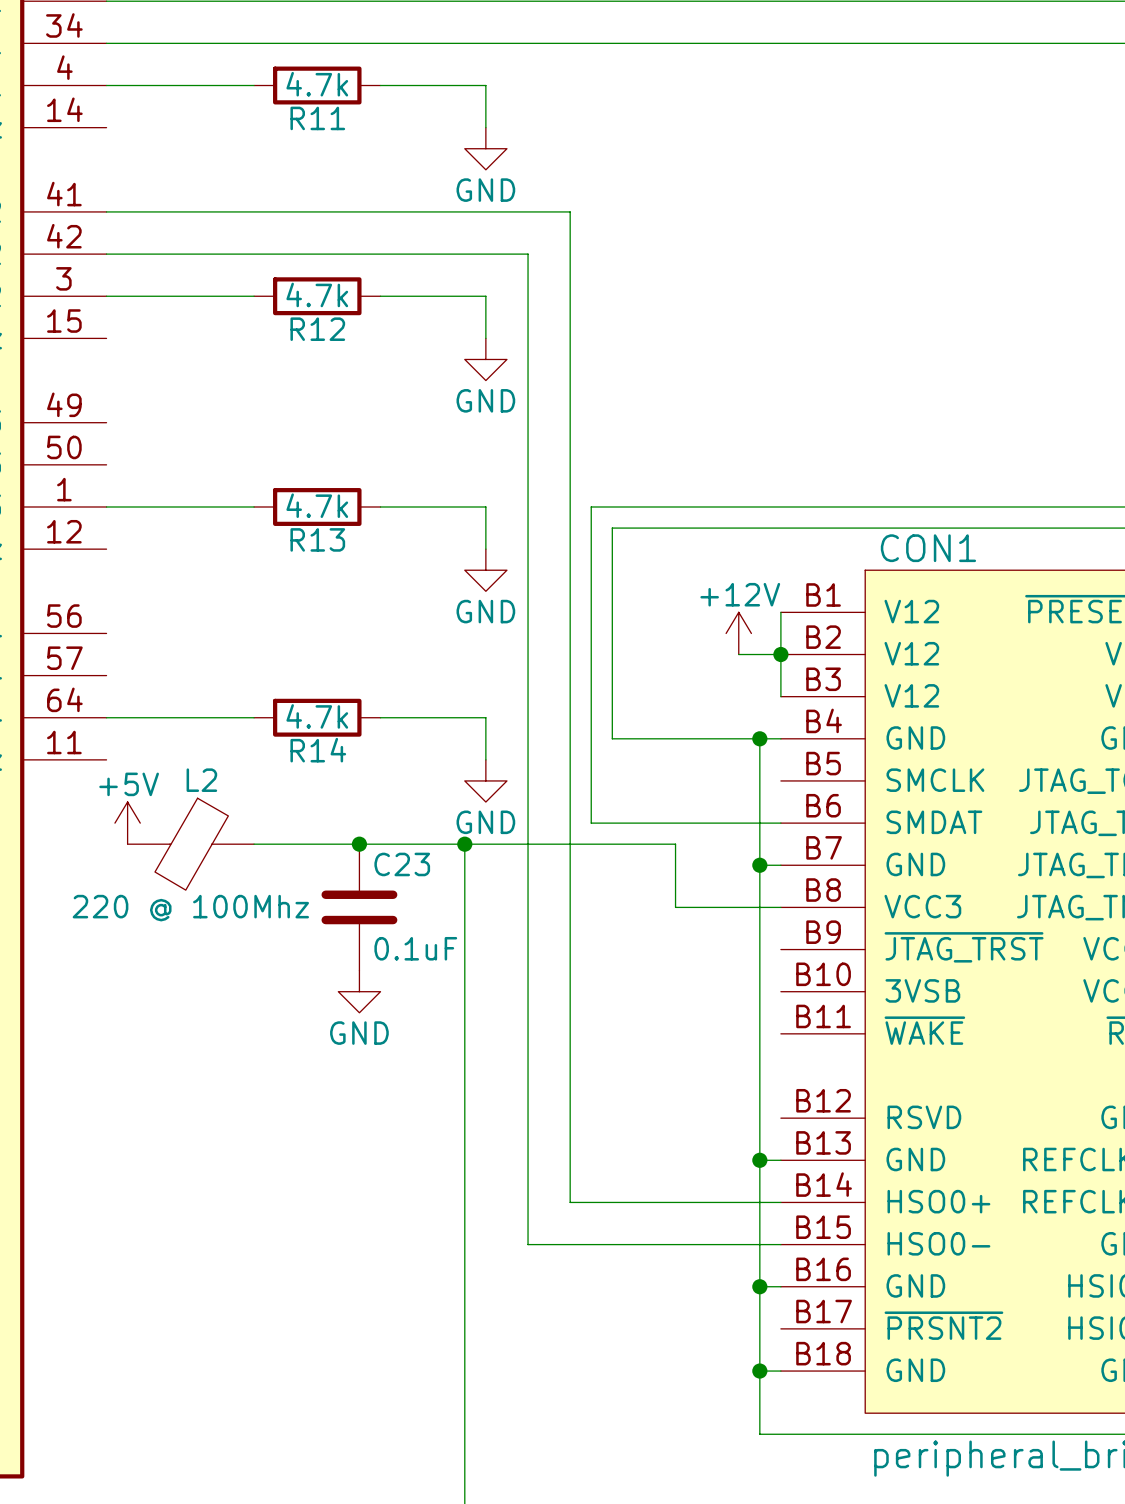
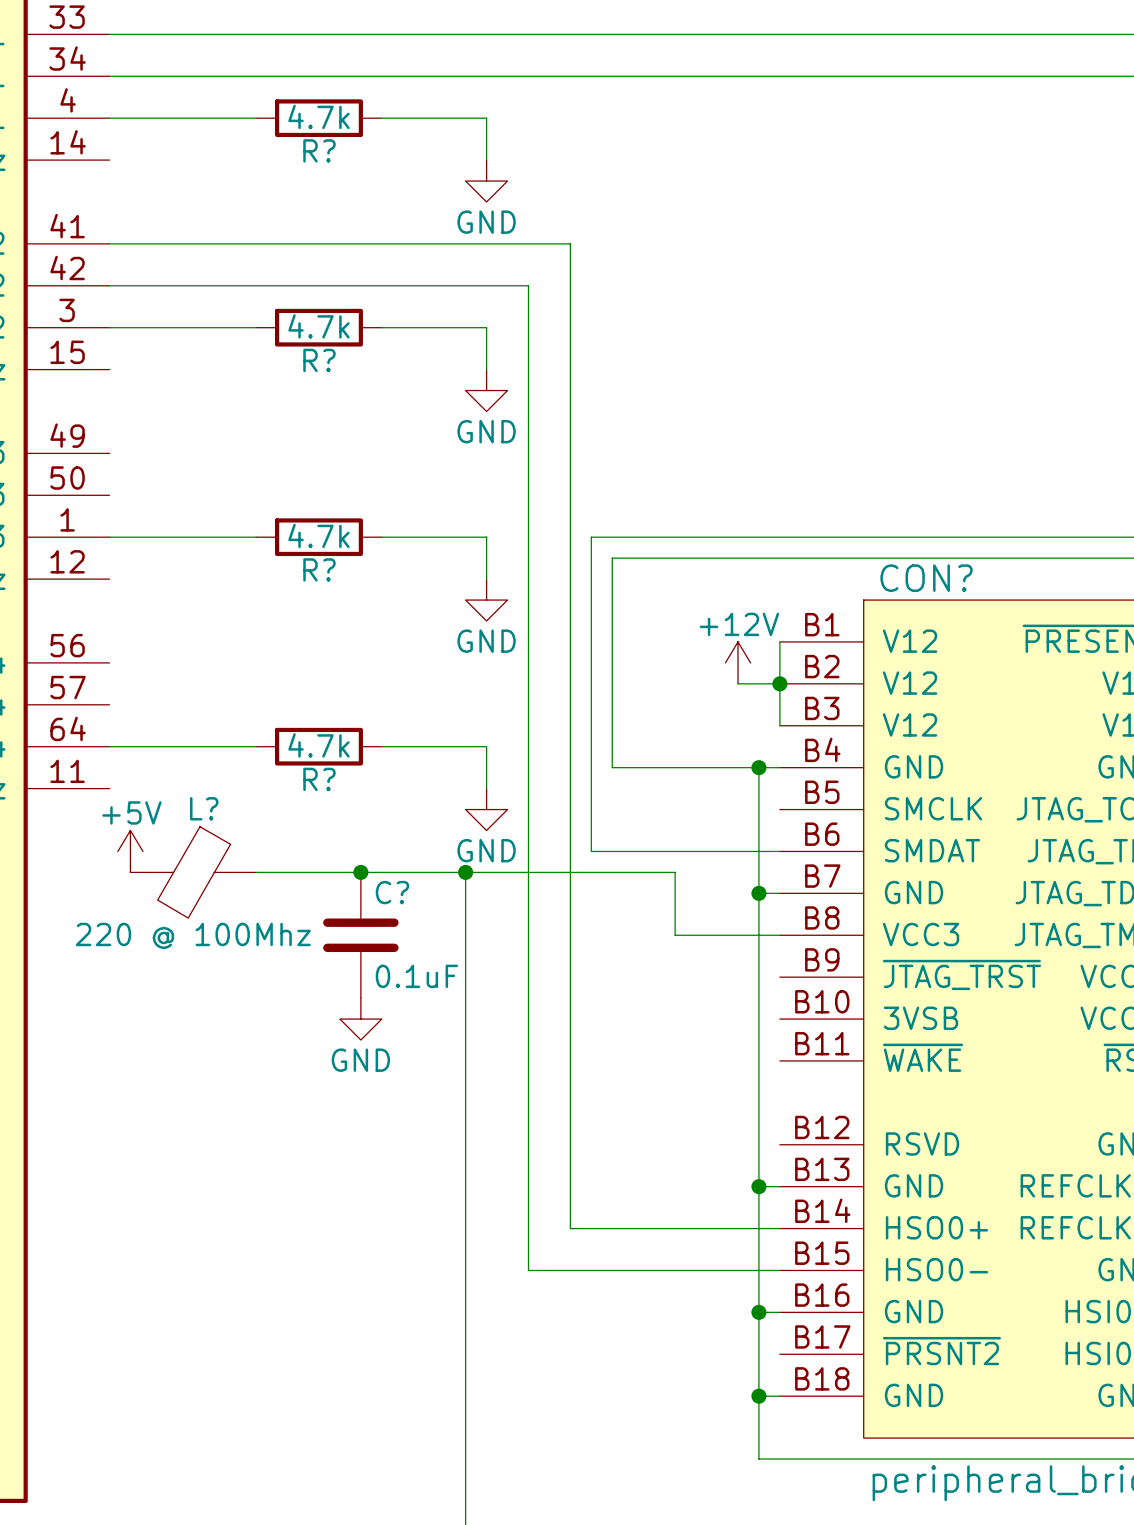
R11 name: R11 (317, 118) -> R? (319, 150)
R12 name: R12 (317, 329) -> R? (319, 360)
R13 name: R13 (317, 539) -> R? (319, 569)
CON1 name: CON1 (928, 548) -> CON? (926, 578)
R14 name: R14 (318, 750) -> R? (319, 779)
L2 name: L2 (201, 780) -> L? (204, 808)
C23 name: C23 (402, 864) -> C? (392, 892)

